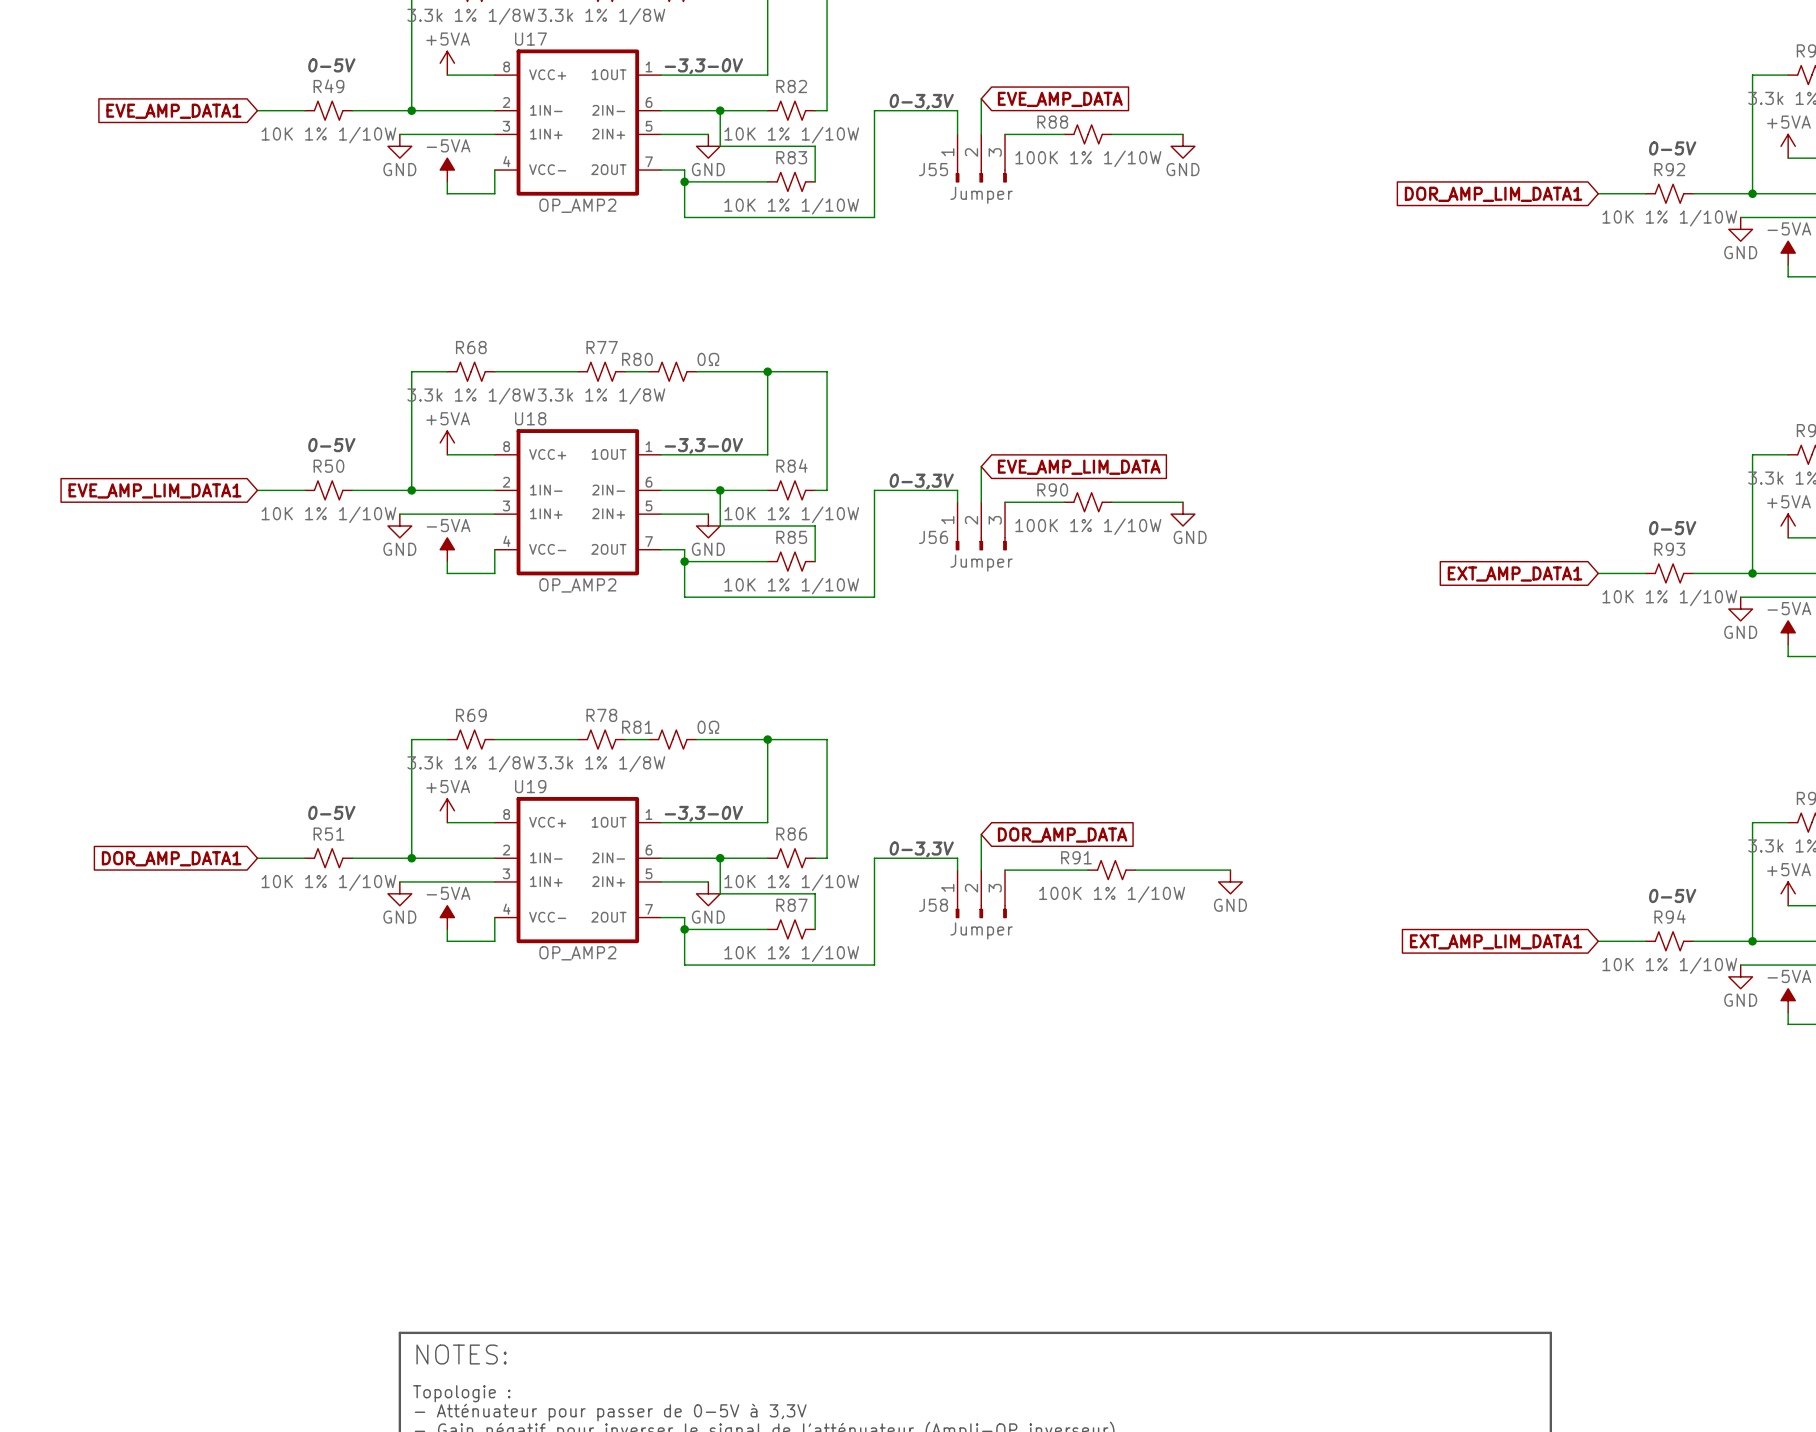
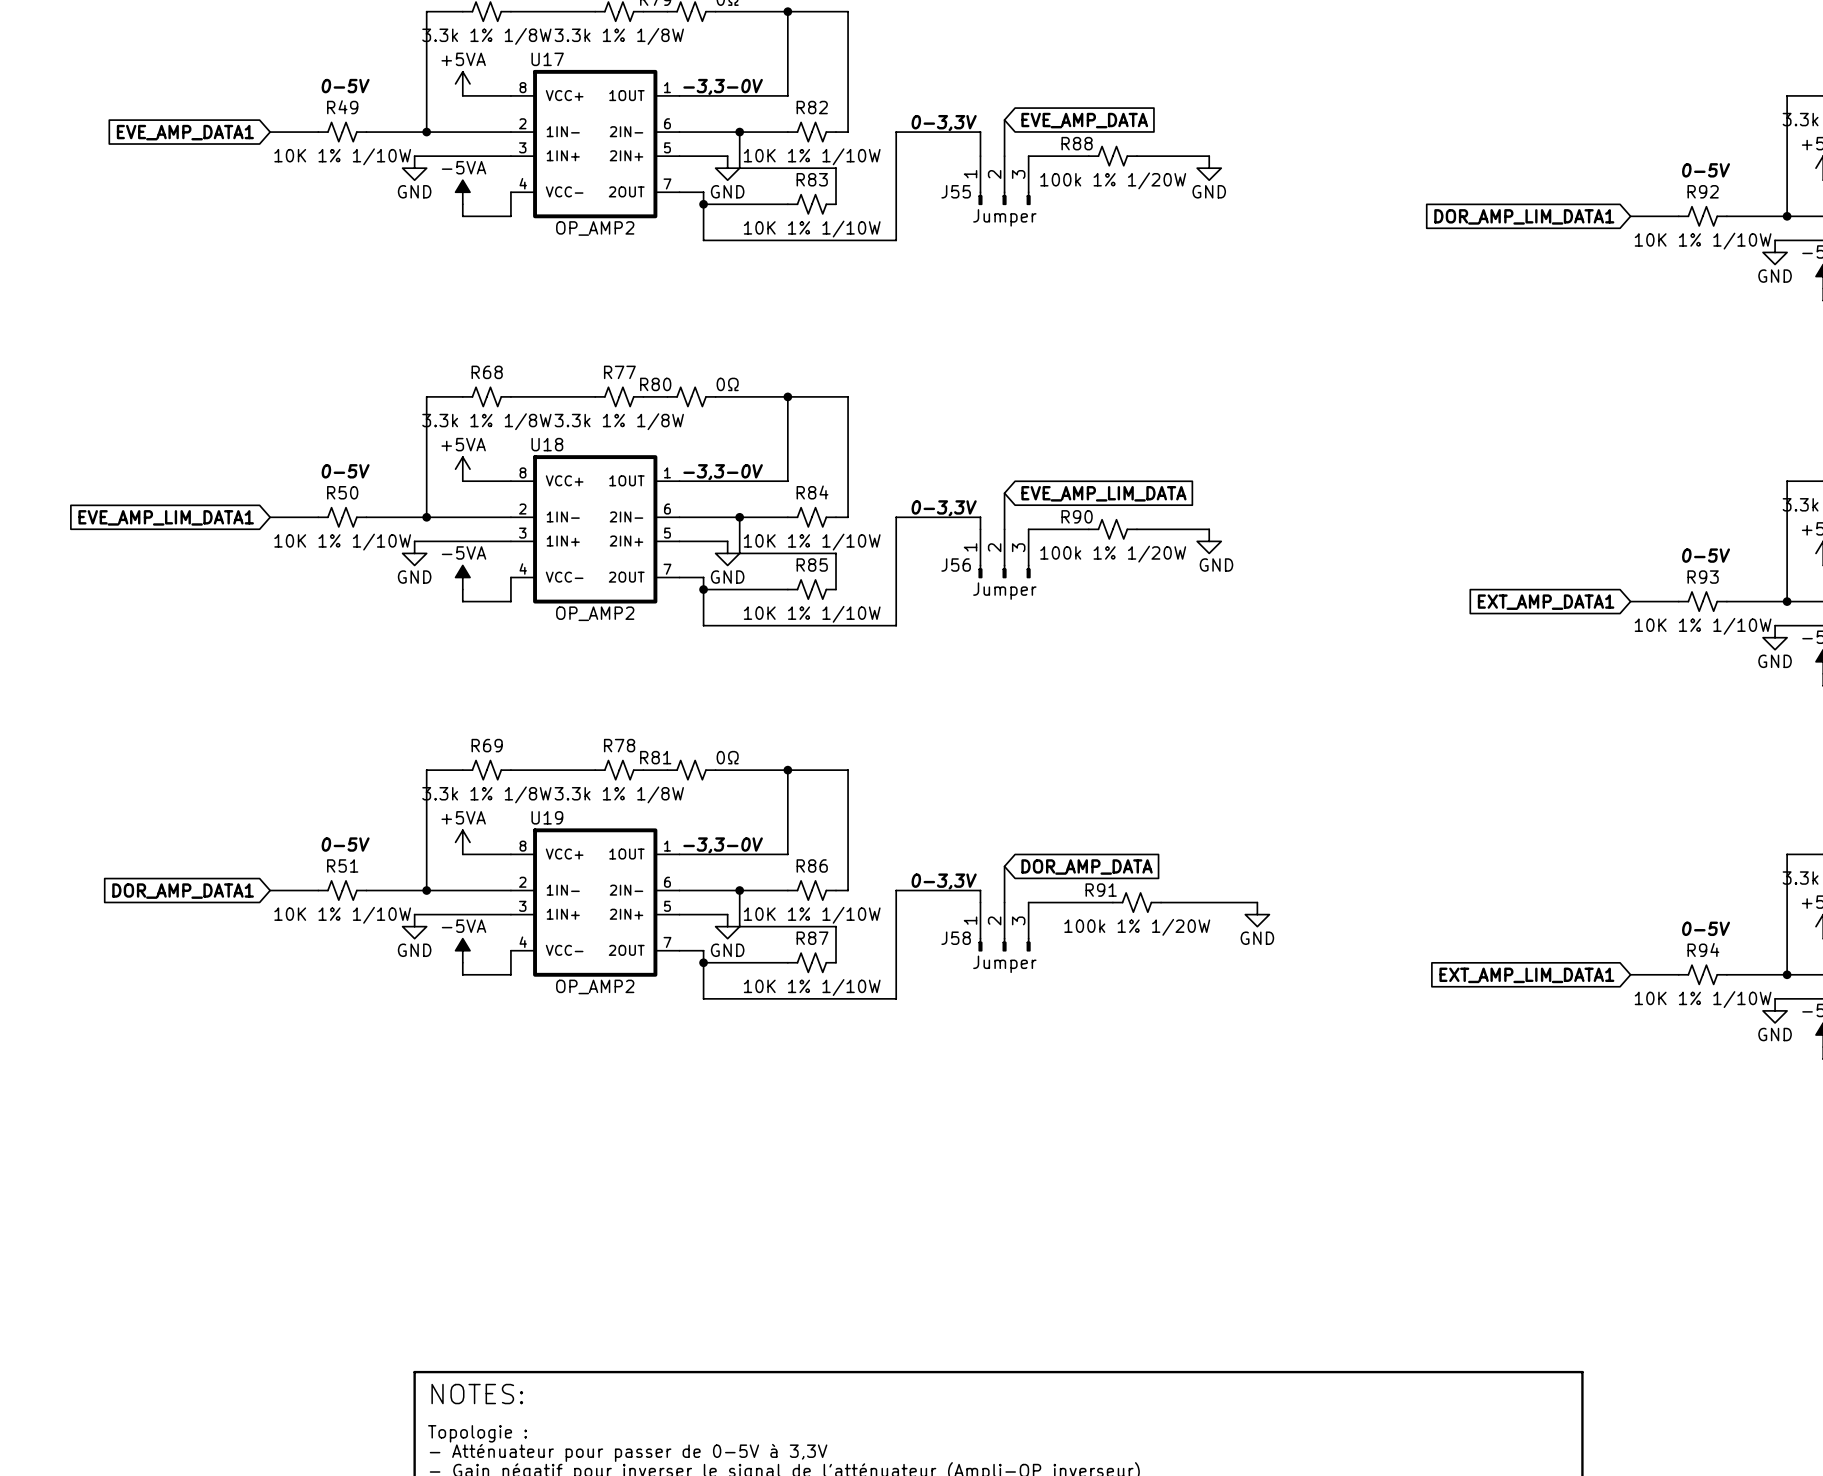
R88 value: 100K 1% 1/10W (1088, 158) -> 100k 1% 1/20W (1113, 180)
R90 value: 100K 1% 1/10W (1088, 526) -> 100k 1% 1/20W (1113, 554)
R91 value: 100K 1% 1/10W (1112, 894) -> 100k 1% 1/20W (1137, 927)

